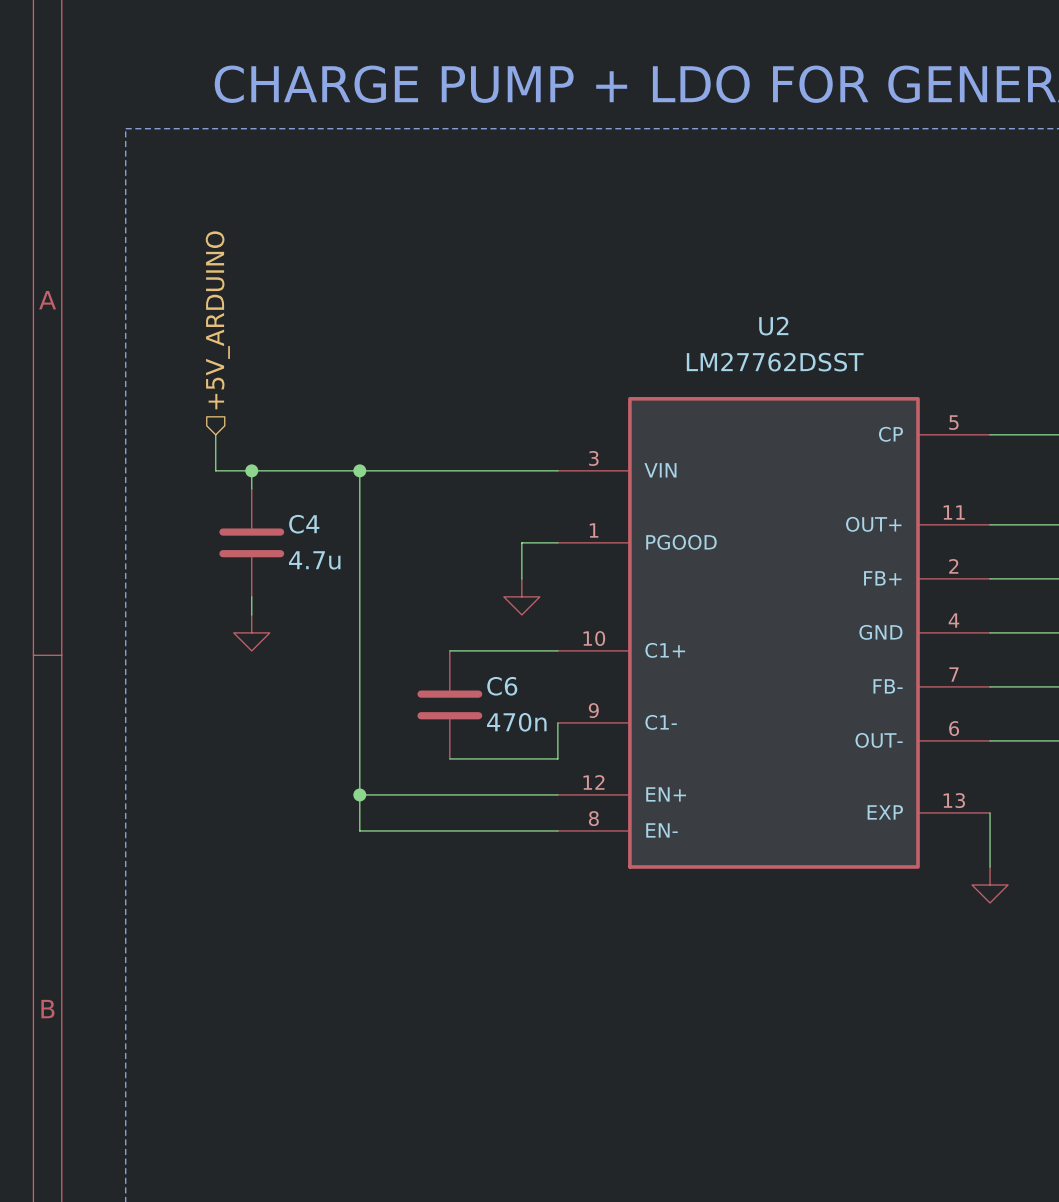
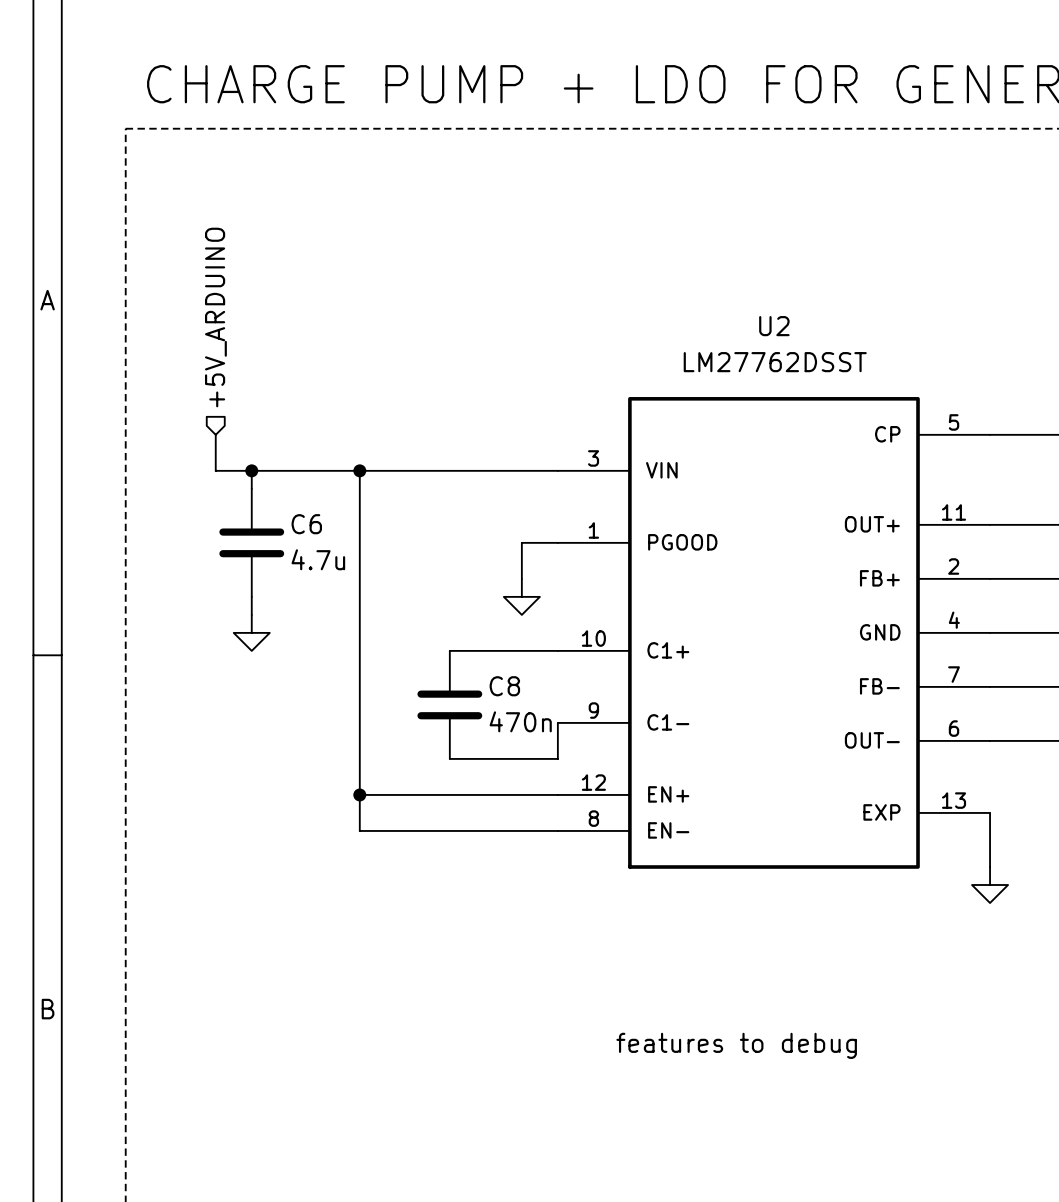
C4 name: C4 (304, 524) -> C6 (306, 524)
C6 name: C6 (502, 686) -> C8 (504, 686)
text: none -> features to debug (736, 1045)

